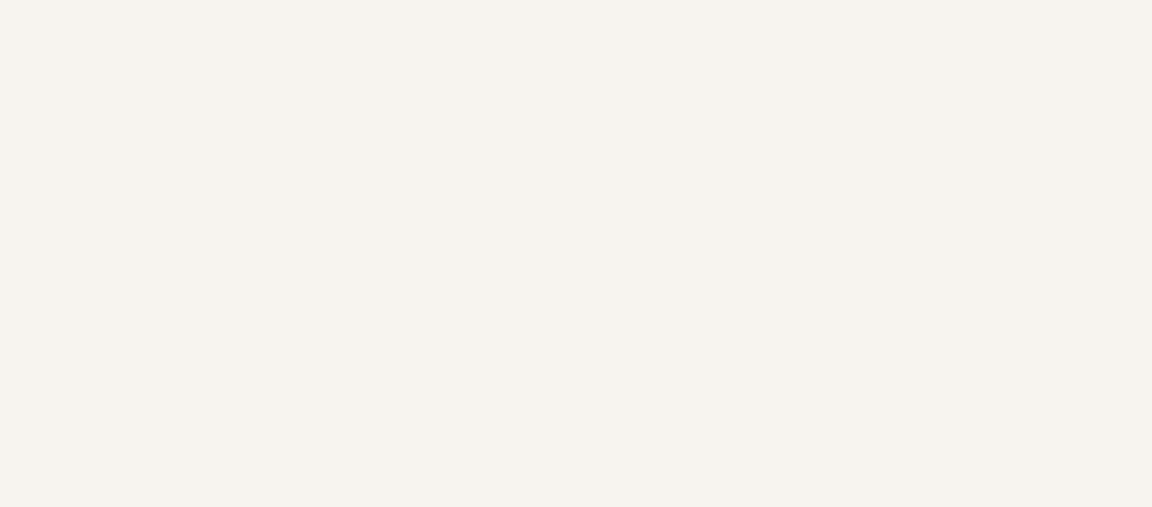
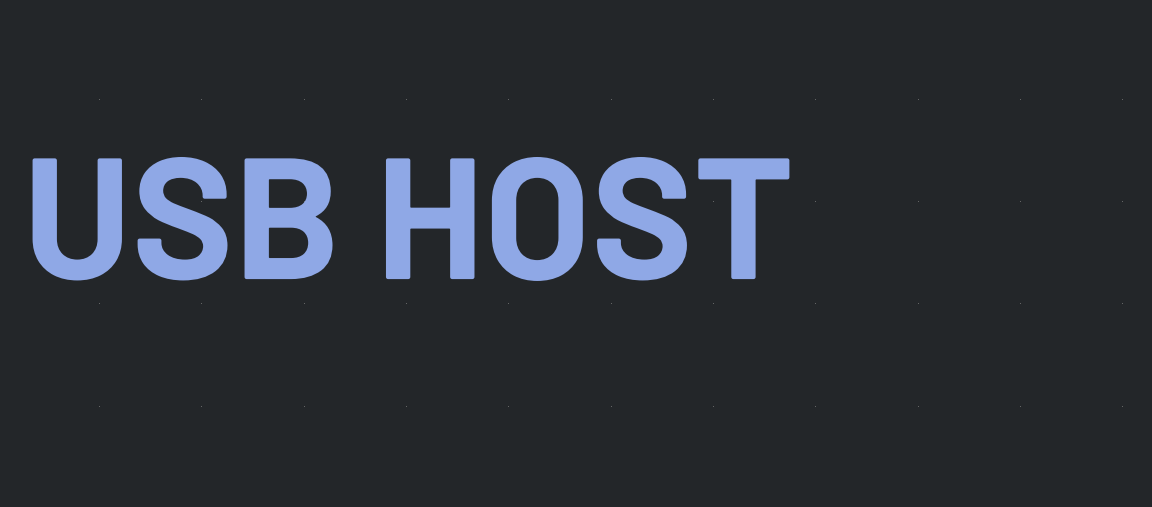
text: none -> USB HOST (410, 218)

